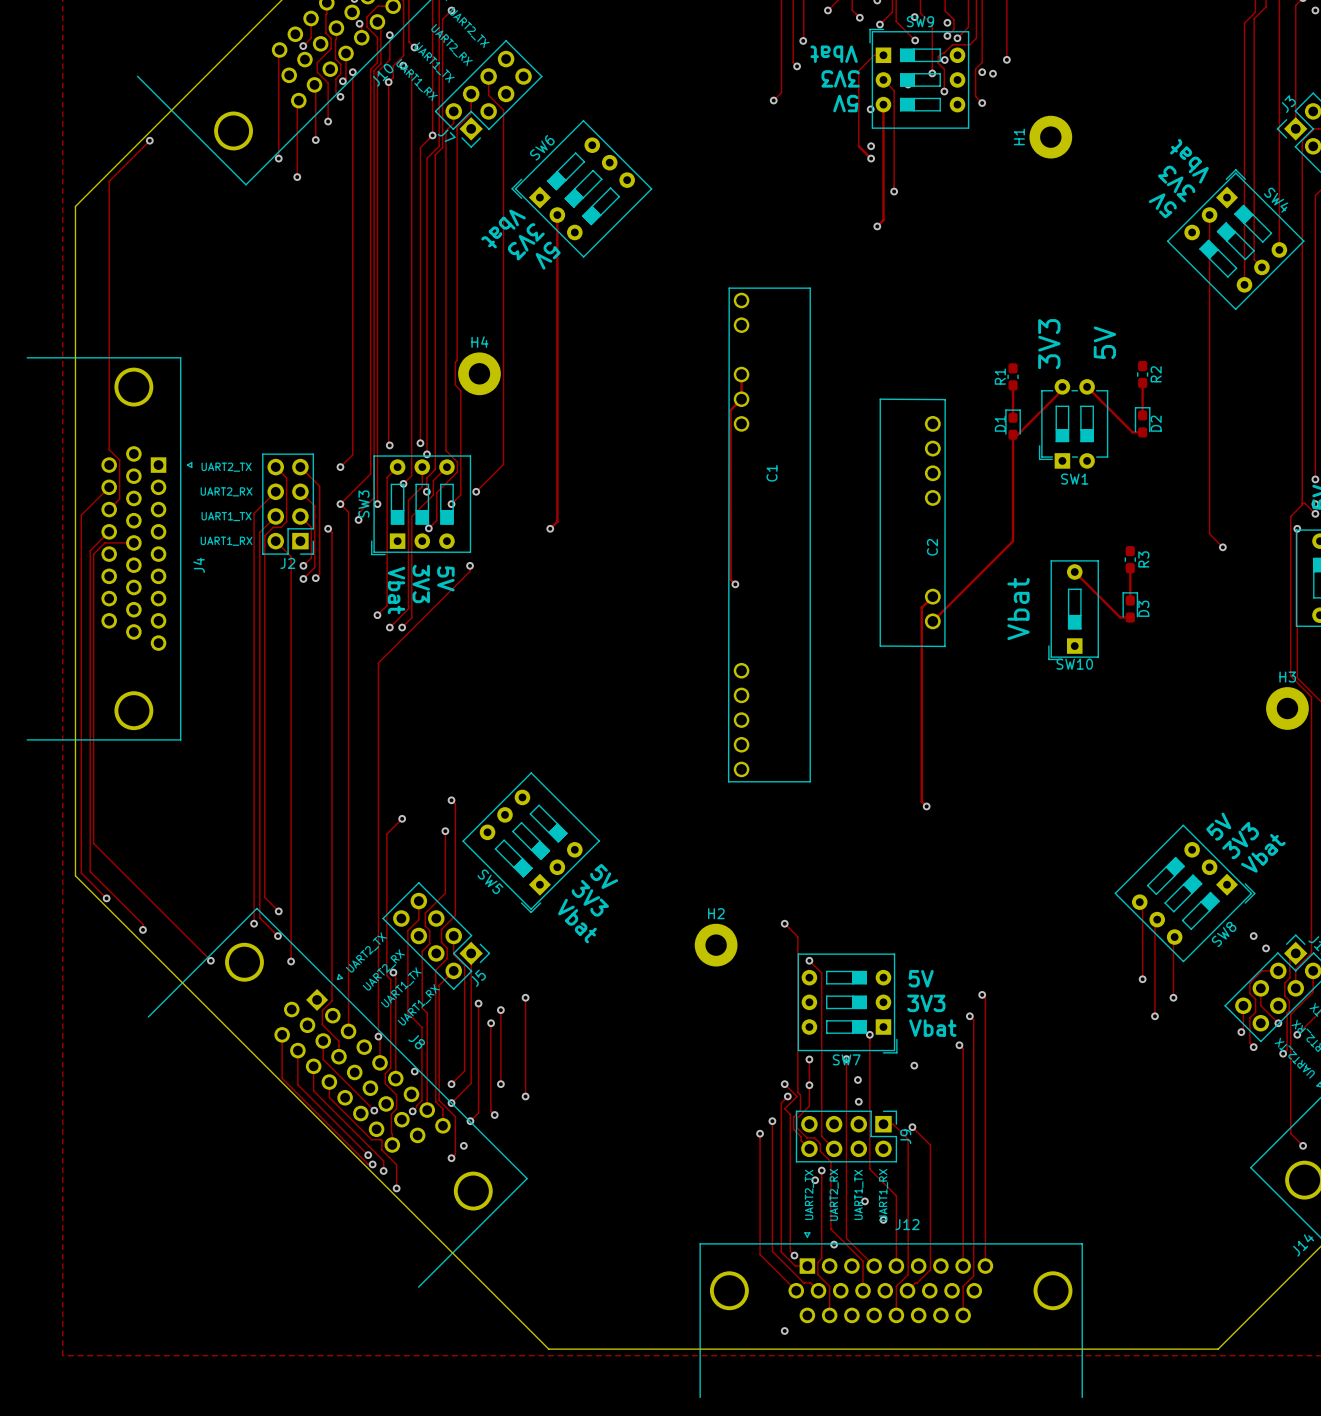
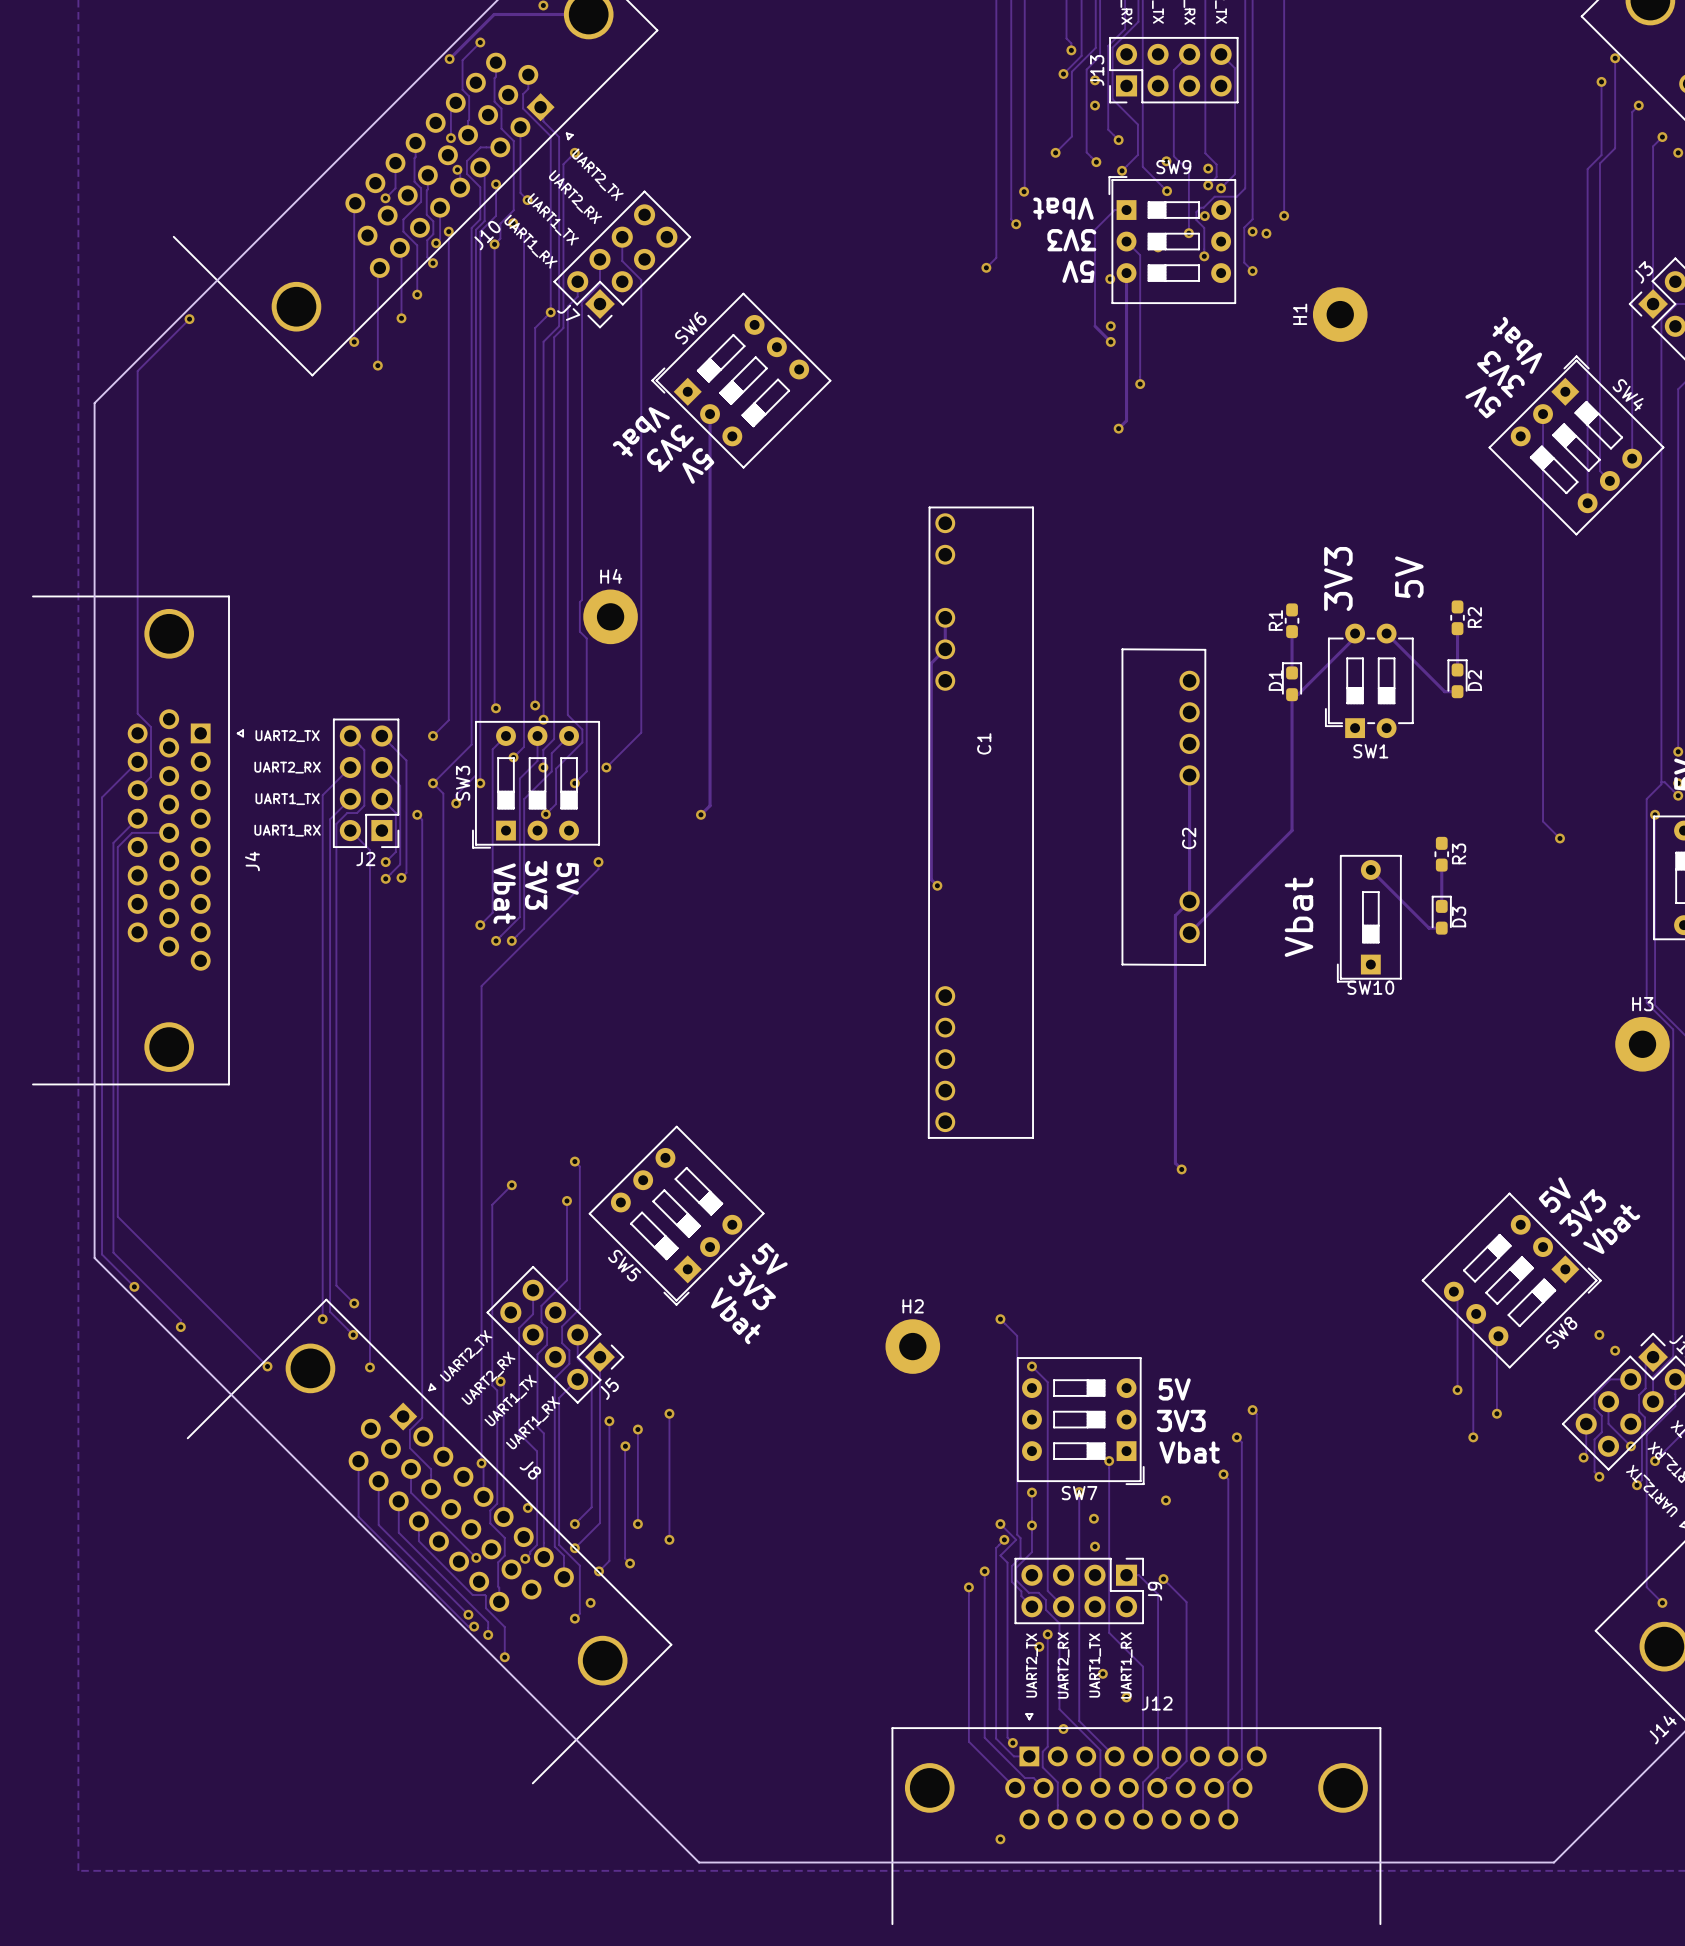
track: none -> (1189, 775) (1189, 901)

